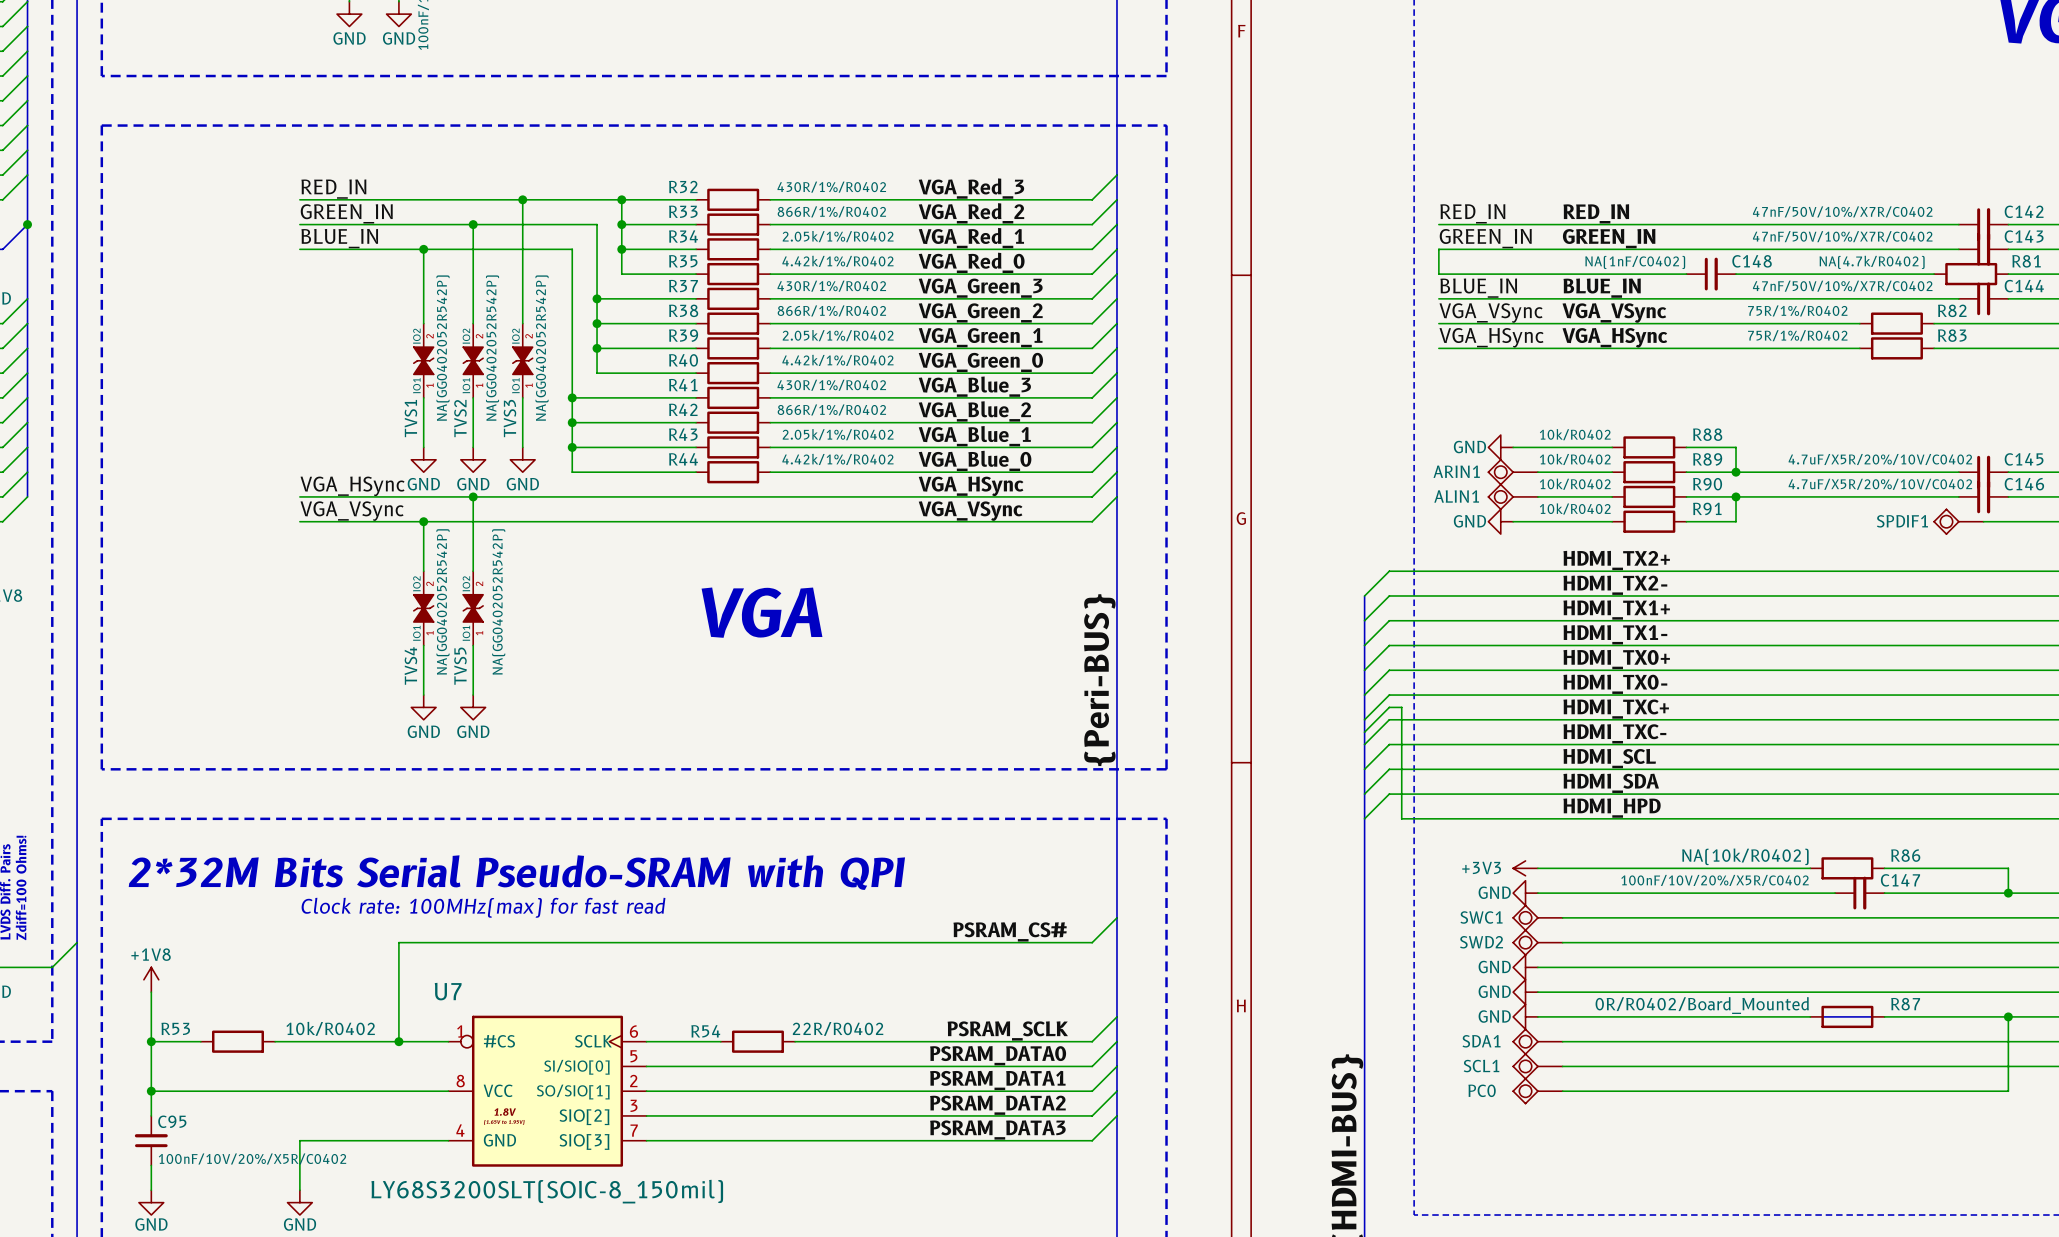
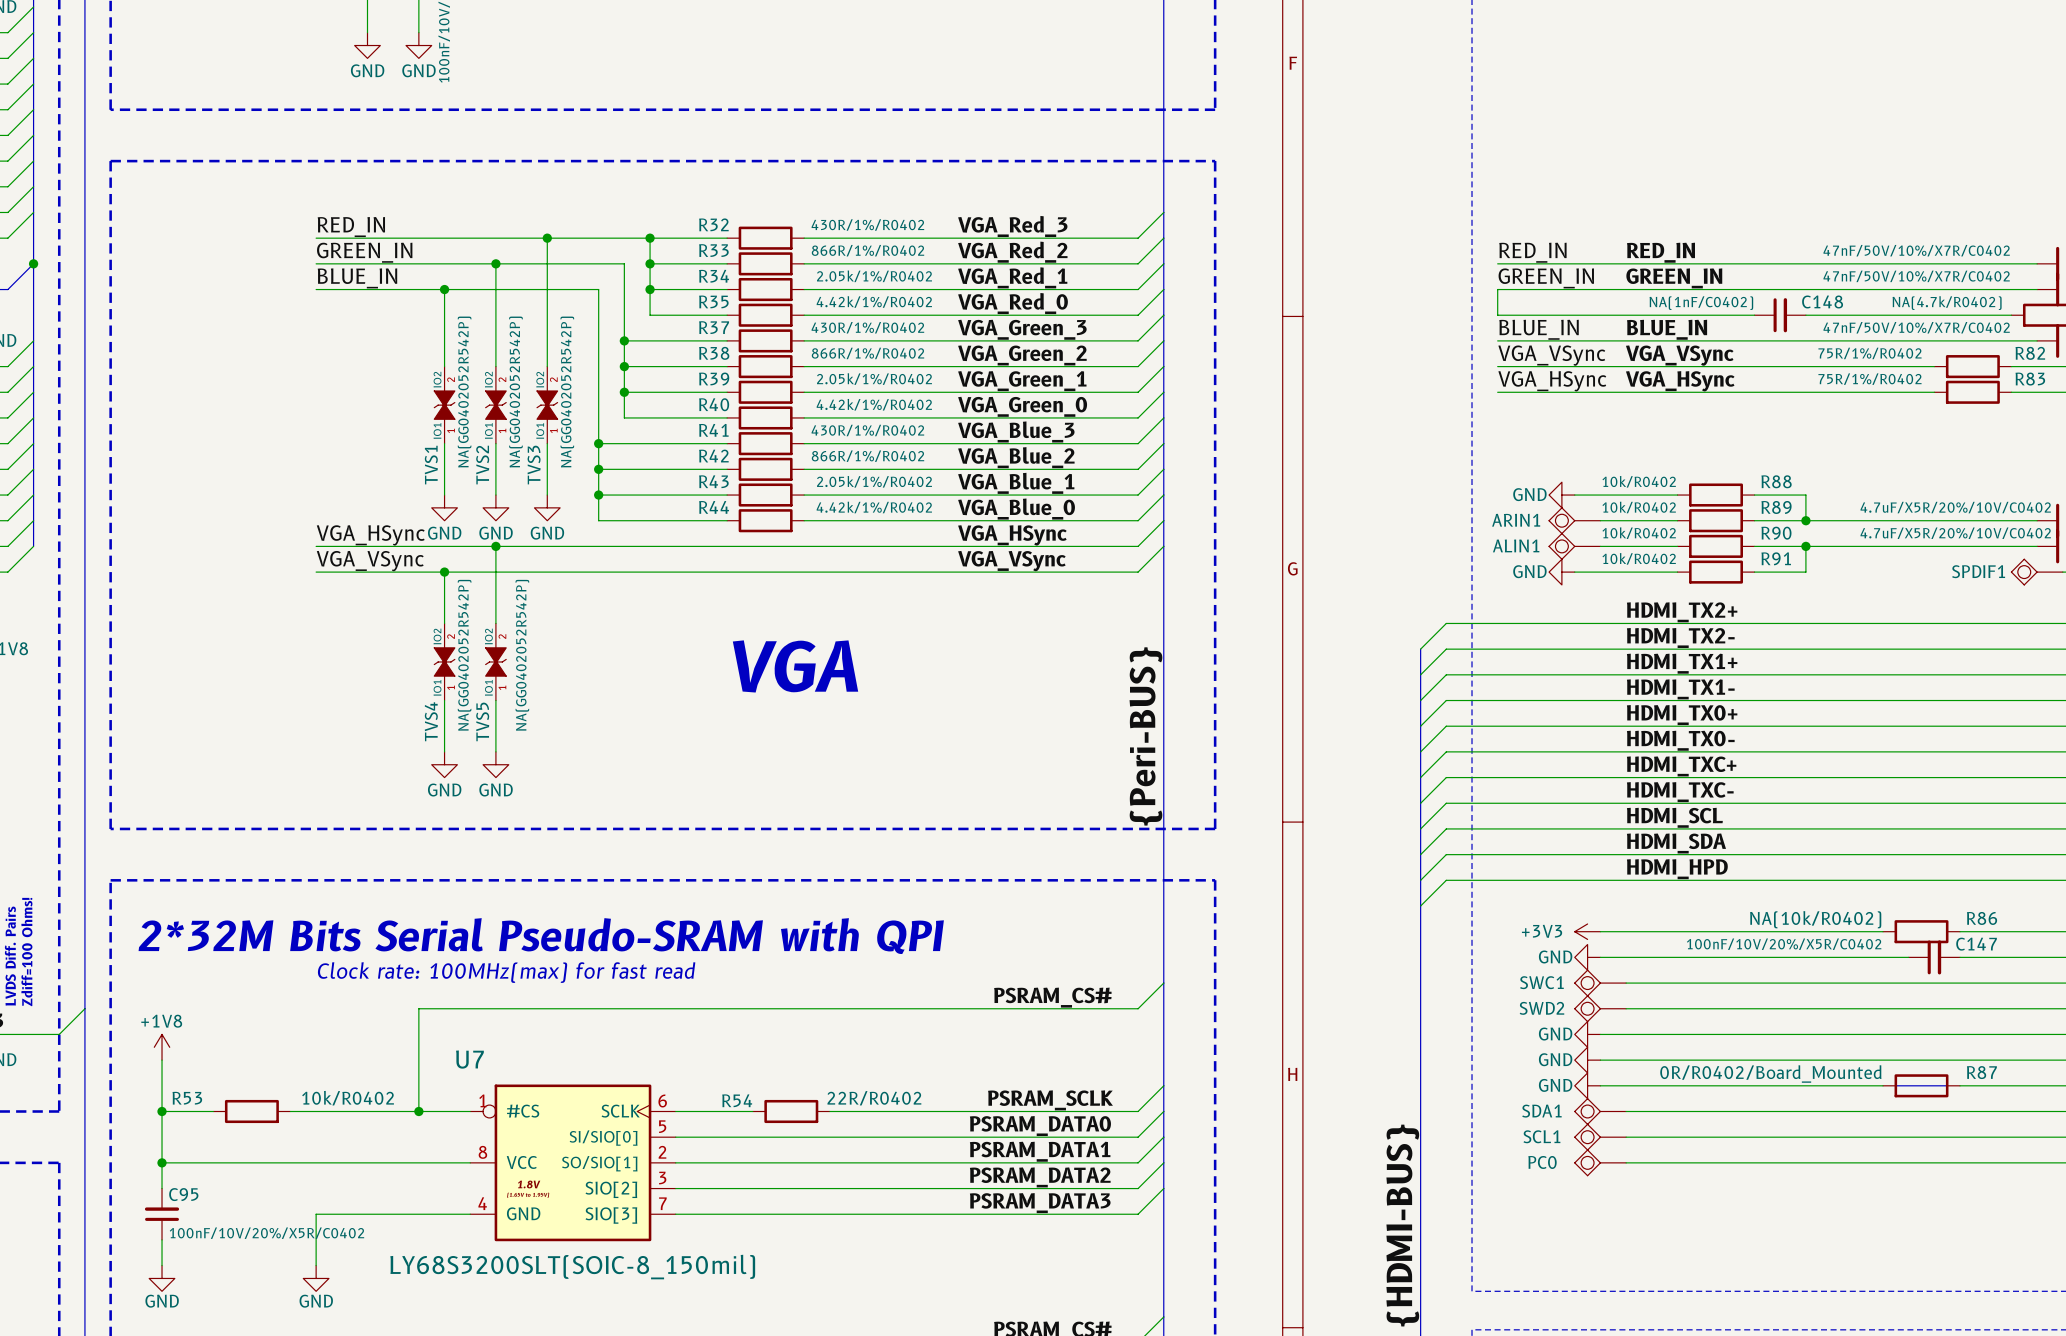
wire: (1364, 732) (1389, 707) (1401, 707) (1401, 818) -> (1420, 906) (1446, 880) (1459, 880)

